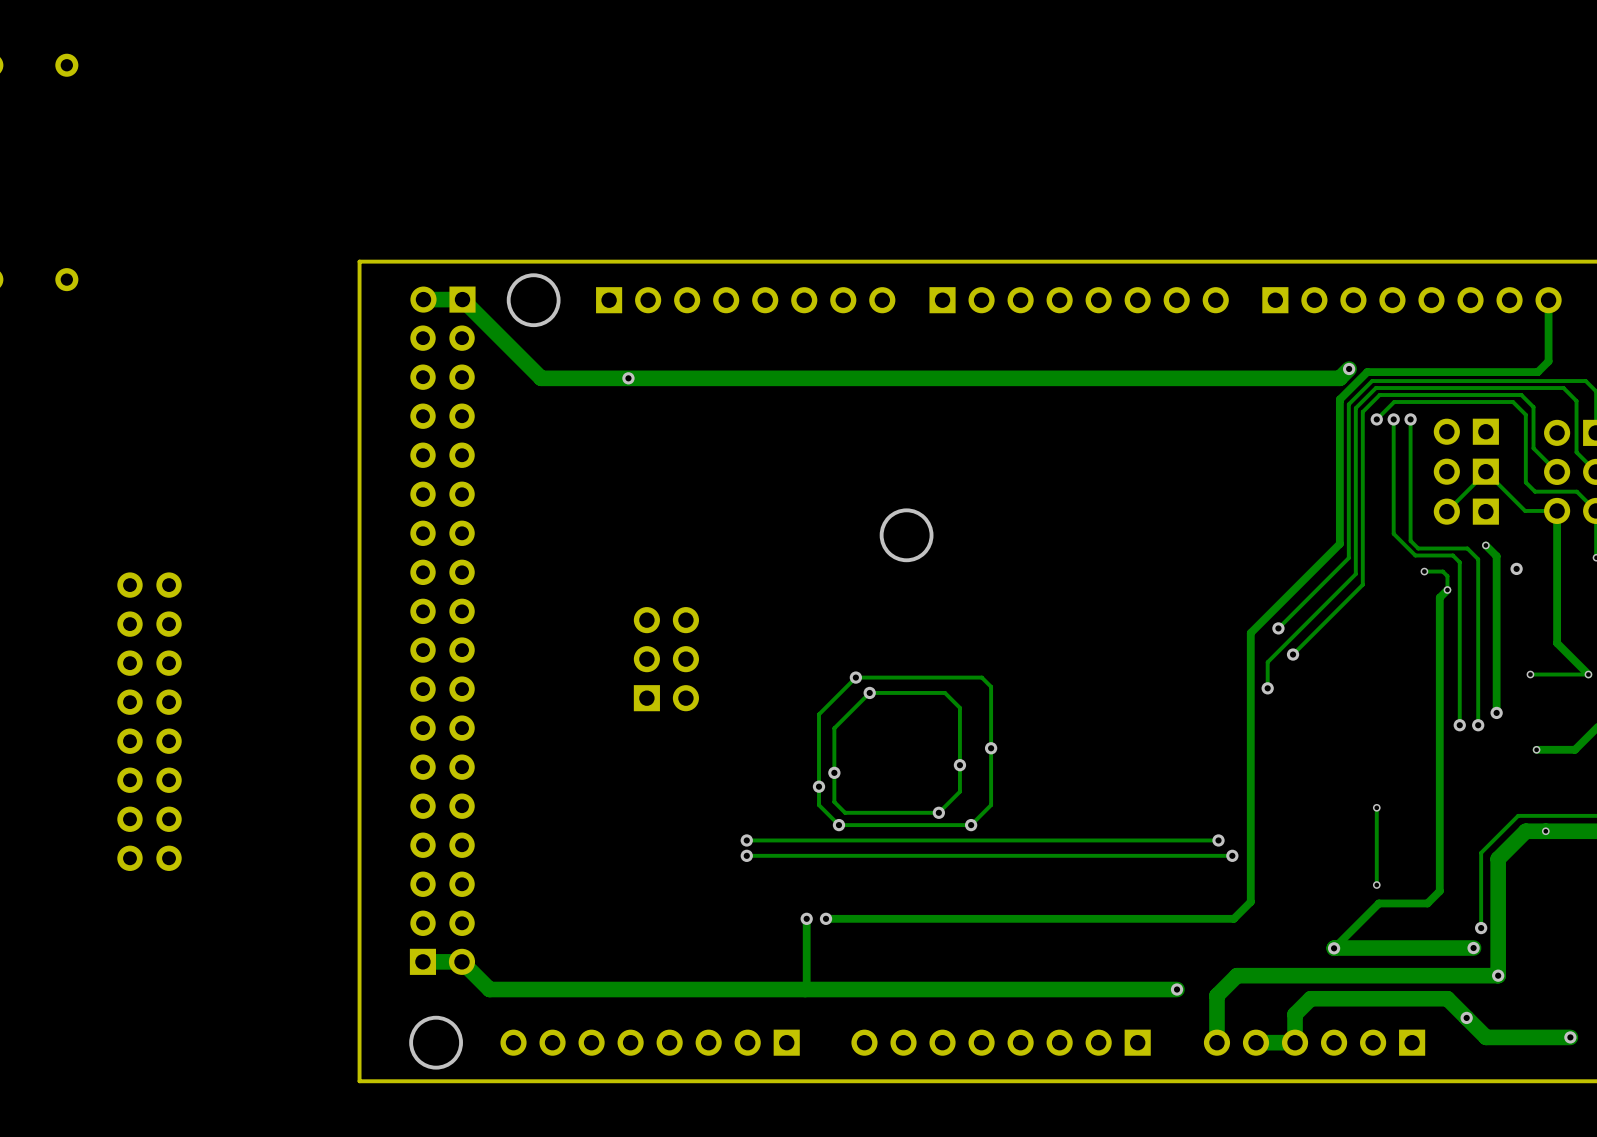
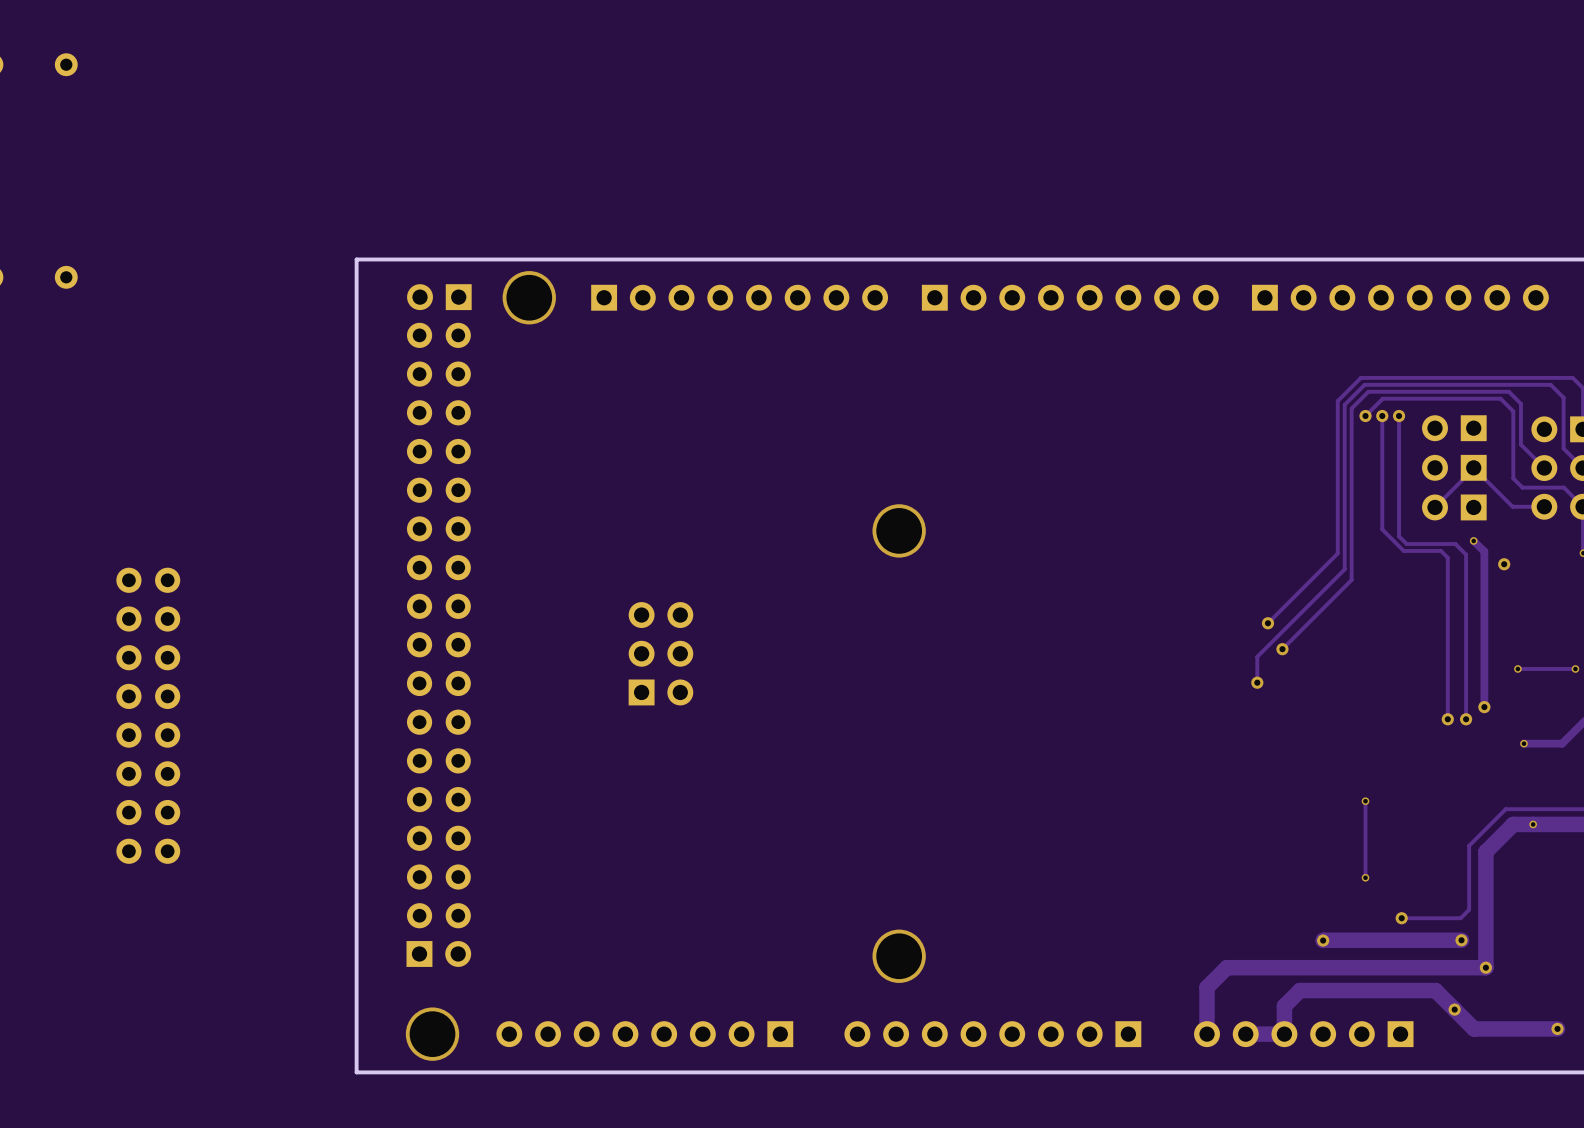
track: (423, 299) (462, 299) (541, 378) (1339, 378) (1349, 368) -> none
track: (1548, 300) (1548, 361) (1537, 372) (1367, 372) (1339, 399) (1339, 543) (1250, 633) (1250, 901) (1233, 918) (826, 918) -> none
via: (1349, 368) -> none
via: (628, 378) -> none
track: (1557, 510) (1557, 643) (1588, 674) -> none
track: (1424, 571) (1442, 571) (1447, 576) (1447, 590) (1439, 597) (1439, 891) (1427, 903) (1378, 903) (1334, 948) -> none
via: (1424, 571) -> none
via: (1447, 590) -> none
via: (855, 677) -> none
track: (981, 677) (991, 686) (991, 805) (971, 825) (838, 825) (819, 805) (819, 714) (855, 677) (981, 677) -> none
via: (869, 692) -> none
track: (945, 692) (959, 707) (959, 791) (938, 812) (845, 812) (834, 802) (834, 728) (869, 692) (945, 692) -> none
via: (991, 748) -> none
via: (959, 765) -> none
via: (834, 772) -> none
via: (819, 786) -> none
via: (938, 812) -> none
via: (838, 825) -> none
via: (971, 825) -> none
via: (746, 840) -> none
track: (1218, 840) (746, 840) -> none
via: (1218, 840) -> none
track: (1481, 852) (1481, 928) -> (1469, 845) (1469, 909) (1460, 918) (1401, 918)
via: (746, 855) -> none
track: (1232, 855) (746, 855) -> none
via: (1232, 855) -> none
track: (806, 918) (806, 987) (805, 989) -> none
via: (806, 918) -> none
via: (826, 918) -> none
via position: (1481, 928) -> (1401, 918)
track: (422, 961) (461, 961) (489, 989) (1177, 989) -> none
via: none -> (899, 956)
via: (1177, 989) -> none

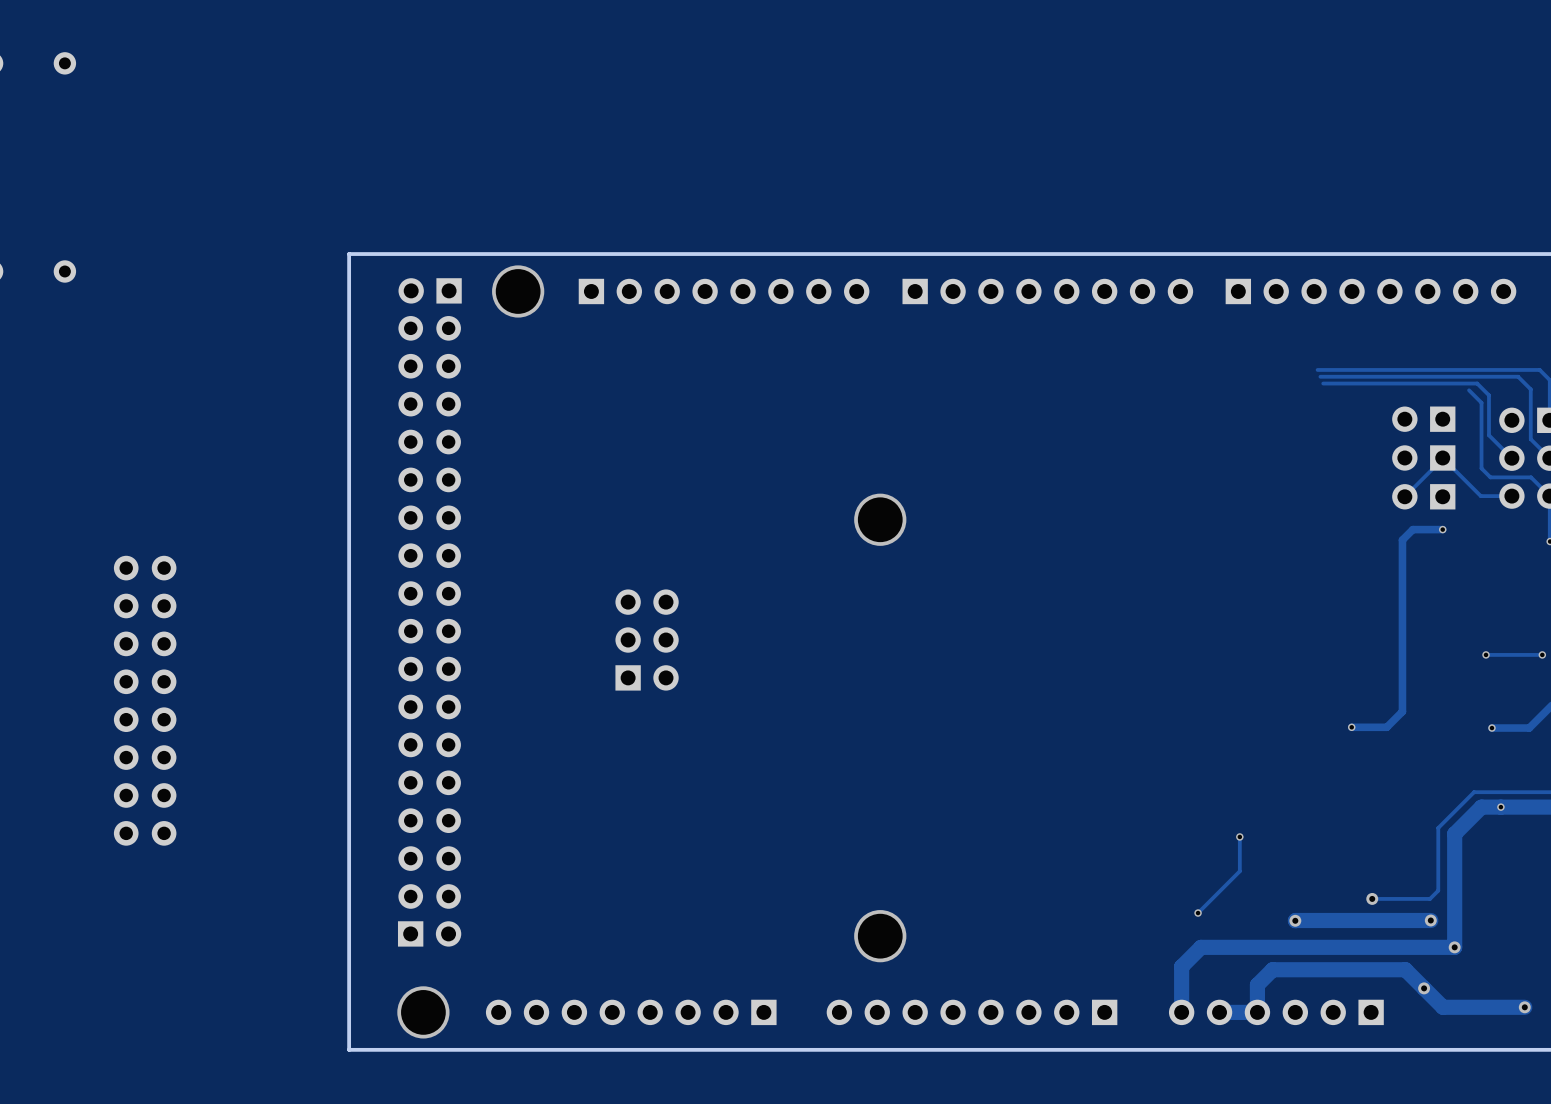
track: (1360, 377) (1337, 401) (1337, 553) (1267, 623) -> (1332, 369) (1317, 369)
track: (1364, 384) (1344, 404) (1344, 569) (1257, 656) (1257, 682) -> (1335, 376) (1320, 376)
track: (1368, 391) (1351, 408) (1351, 579) (1282, 649) -> (1339, 383) (1323, 383)
track: (1500, 398) (1382, 398) (1365, 416) -> none
via: (1365, 416) -> none
track: (1382, 416) (1382, 529) (1403, 550) (1441, 550) (1447, 557) (1447, 719) -> none
via: (1382, 416) -> none
track: (1399, 416) (1399, 536) (1406, 544) (1455, 544) (1466, 554) (1466, 719) -> none
via: (1399, 416) -> none
track: (1473, 540) (1484, 551) (1484, 707) -> (1442, 529) (1412, 529) (1402, 540) (1402, 711) (1386, 727) (1351, 727)
via: (1504, 564) -> none
via: (1267, 623) -> none
via: (1282, 649) -> none
via: (1257, 682) -> none
via: (1484, 707) -> none
via: (1447, 719) -> none
via: (1466, 719) -> none
via: none -> (1351, 727)
track: (1365, 801) (1365, 877) -> none
via: (1365, 801) -> none
track: none -> (1239, 836) (1239, 871) (1198, 913)
via: none -> (1239, 836)
via: (1365, 877) -> none
via: none -> (1198, 913)

